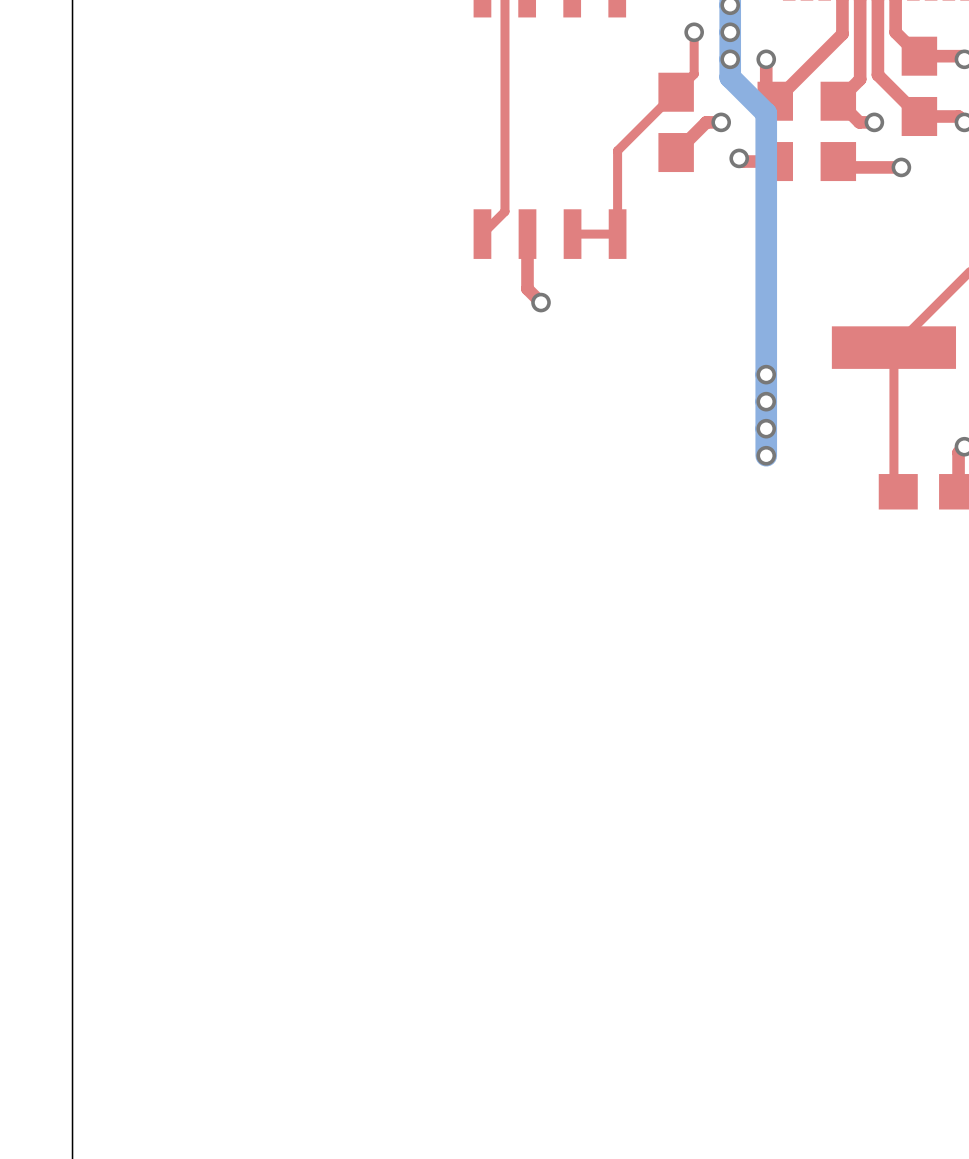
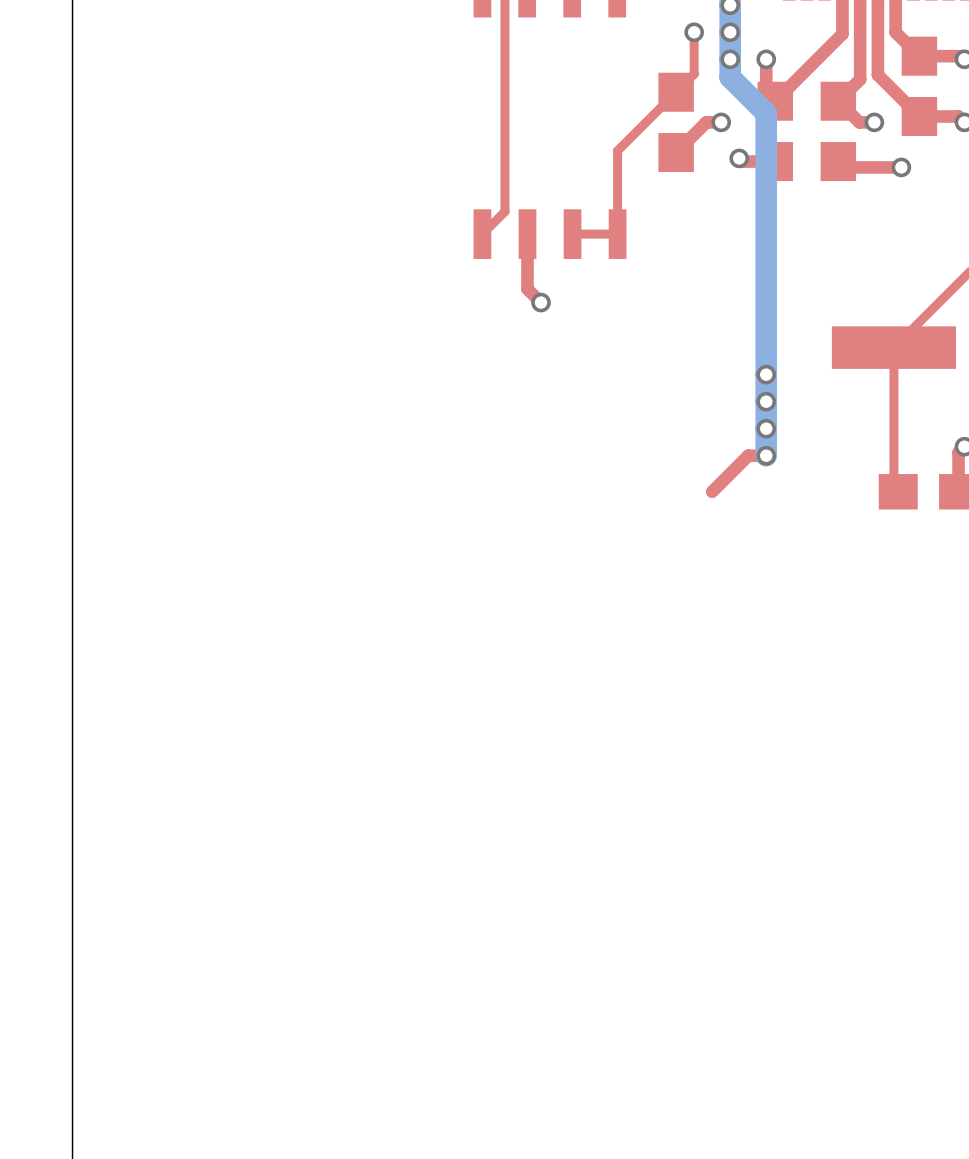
top track: none -> (766, 455) (748, 455) (712, 491)

